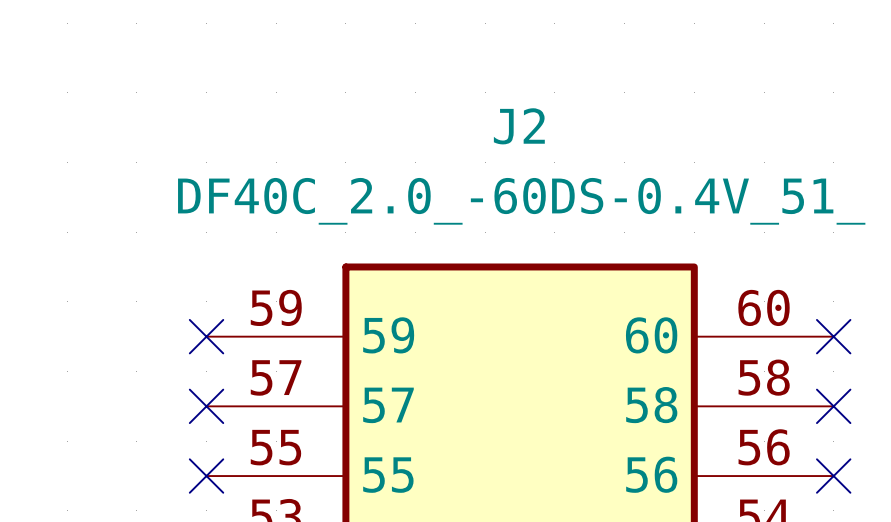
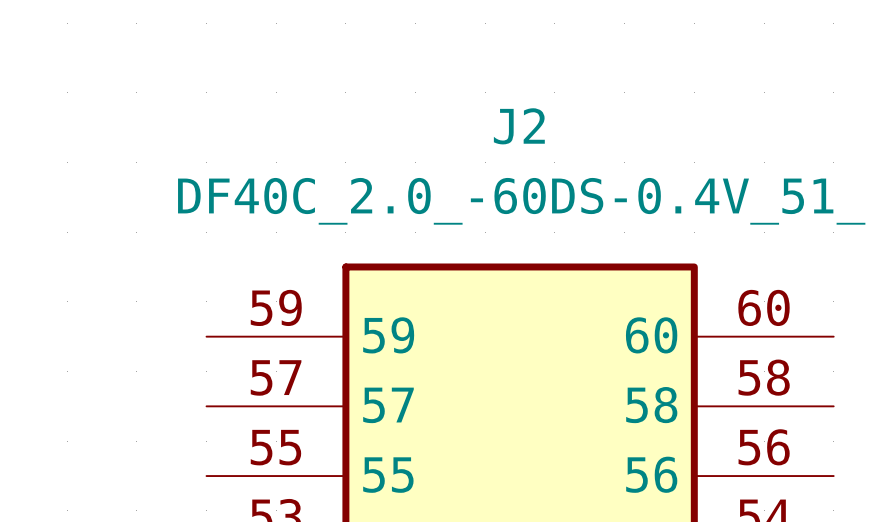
no-connect mark: (206, 336) -> none
no-connect mark: (833, 336) -> none
no-connect mark: (206, 406) -> none
no-connect mark: (833, 406) -> none
no-connect mark: (206, 476) -> none
no-connect mark: (833, 476) -> none

